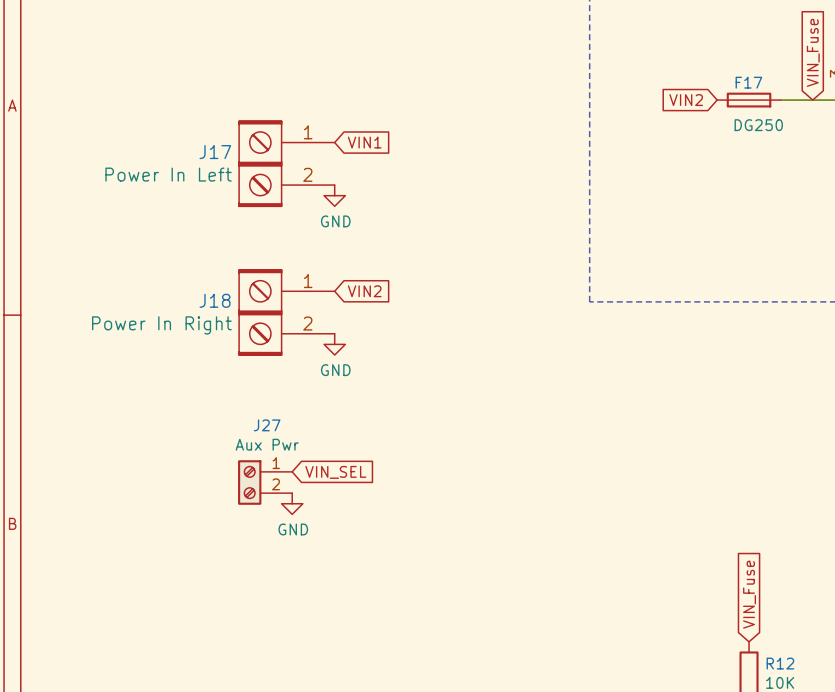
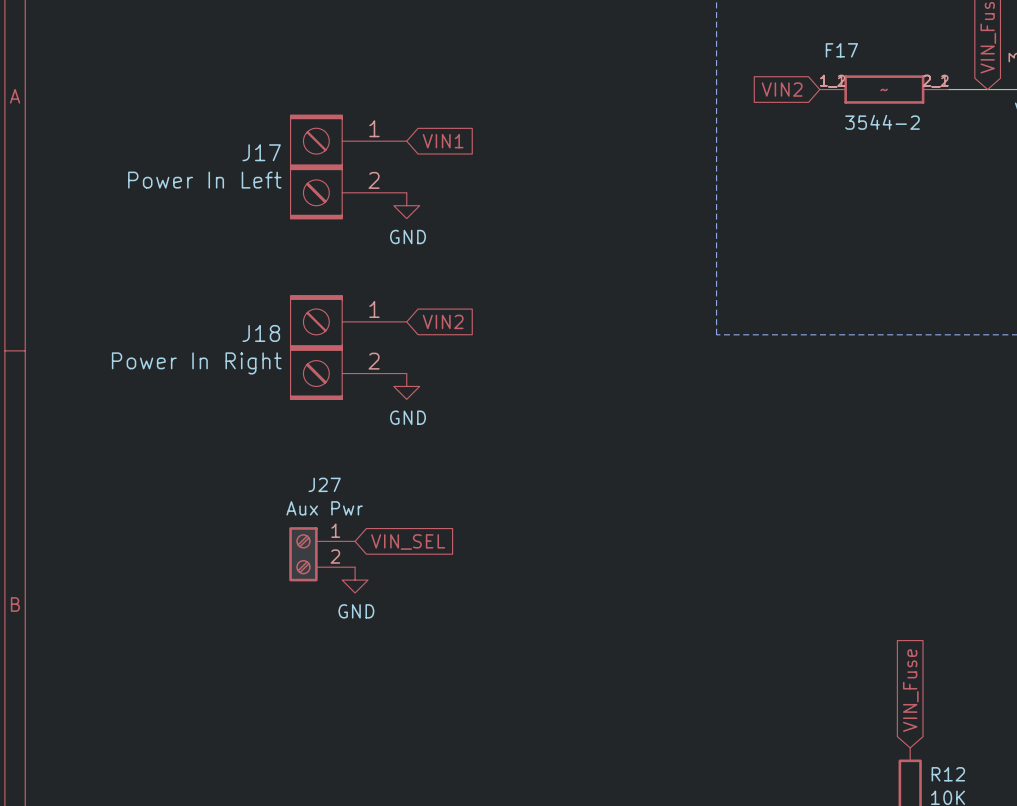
F17 name position: F17 (748, 82) -> F17 (841, 50)
F17 symbol: [717, 92, 781, 108] -> [819, 75, 949, 104]
global label position: VIN2 (686, 100) -> VIN2 (782, 89)
F17 value: DG250 (758, 125) -> 3544-2 (882, 122)

